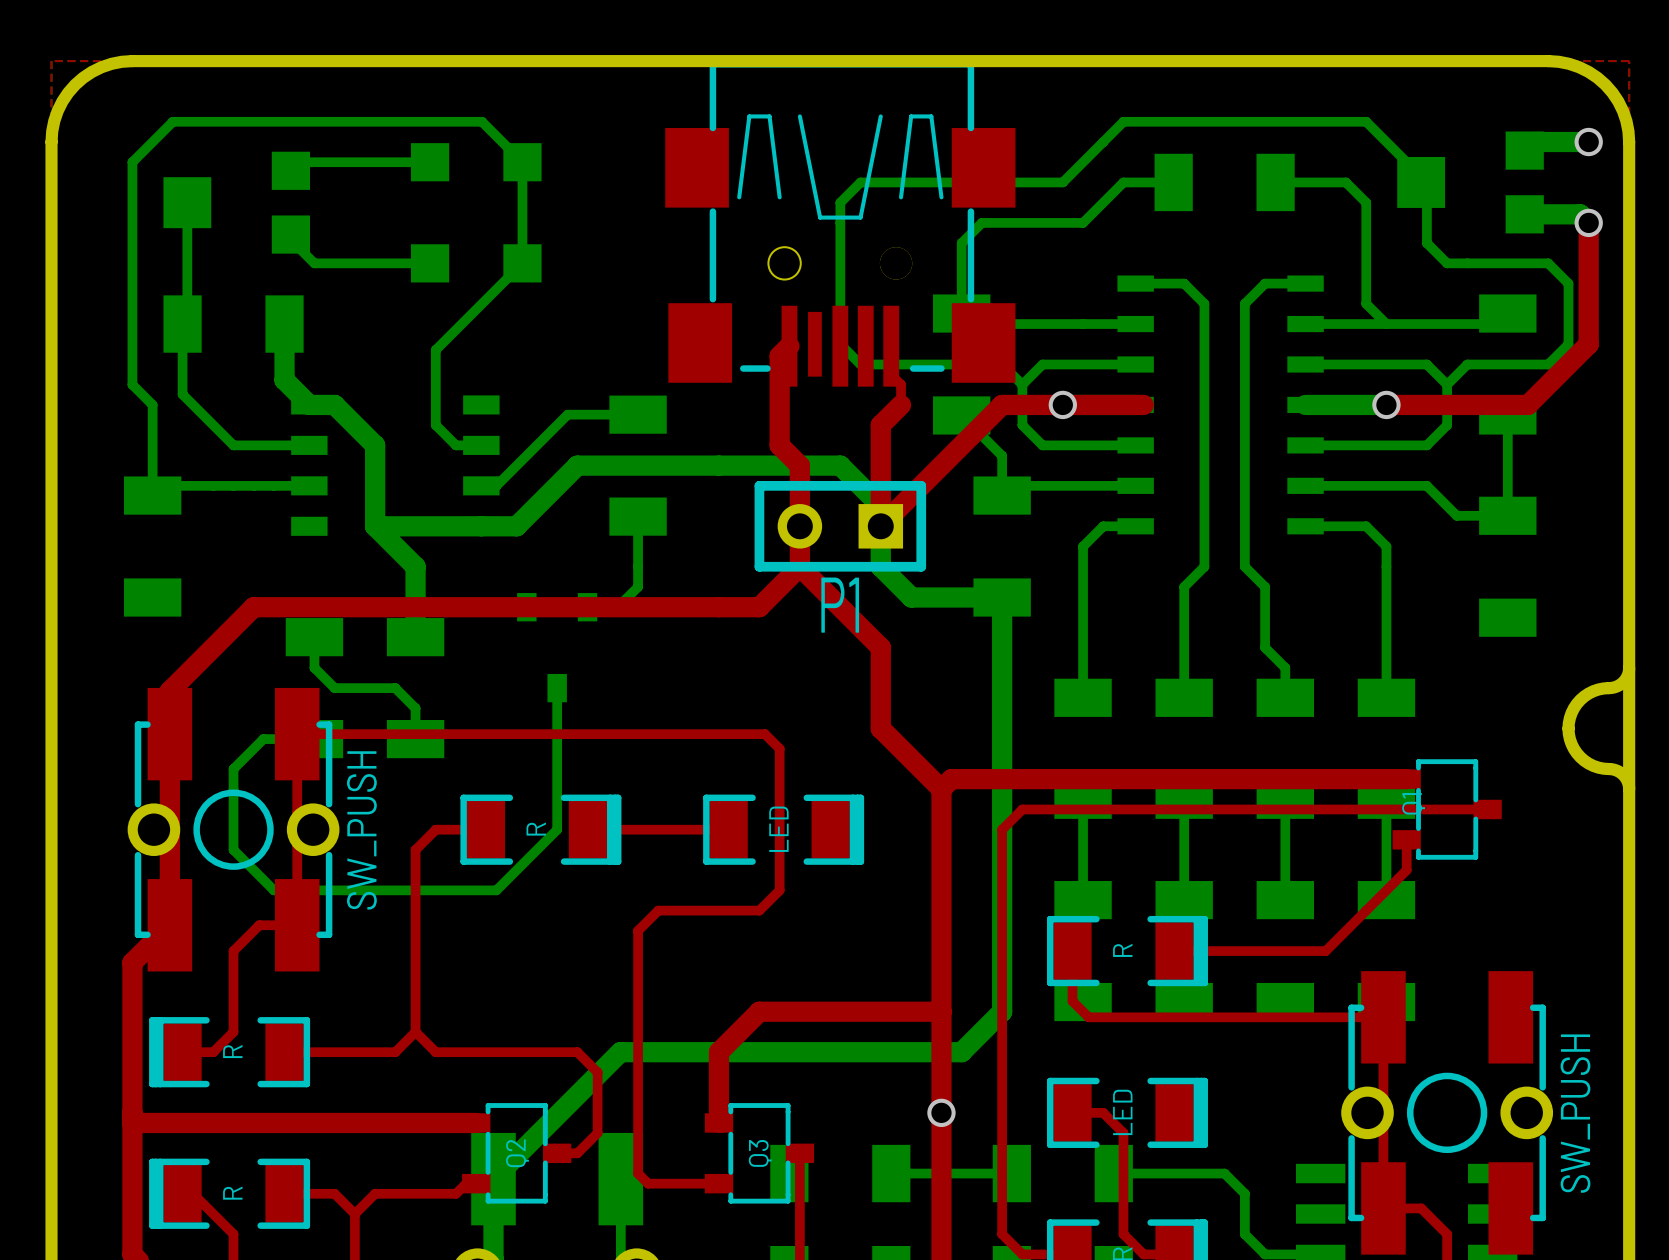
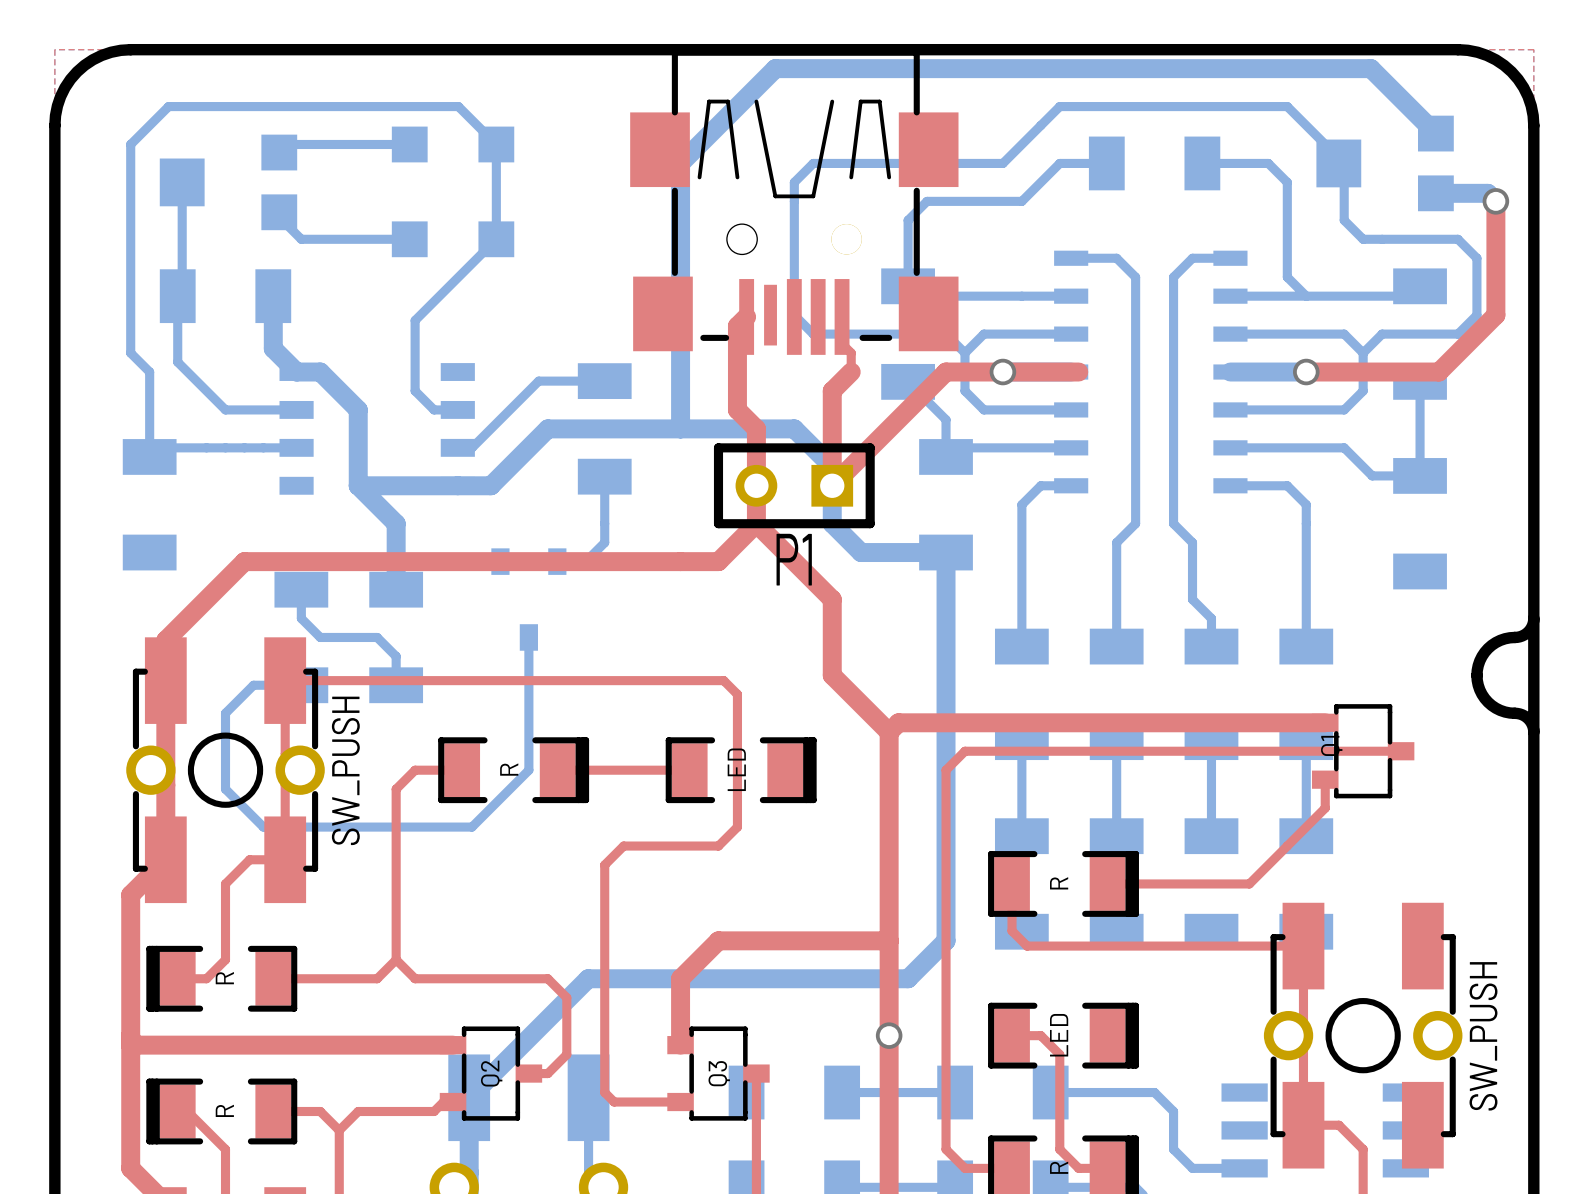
bottom track: (1533, 142) (1588, 142) -> none
via: (1588, 142) -> none
bottom track: none -> (1435, 133) (1370, 68) (775, 68) (680, 163) (680, 428)

